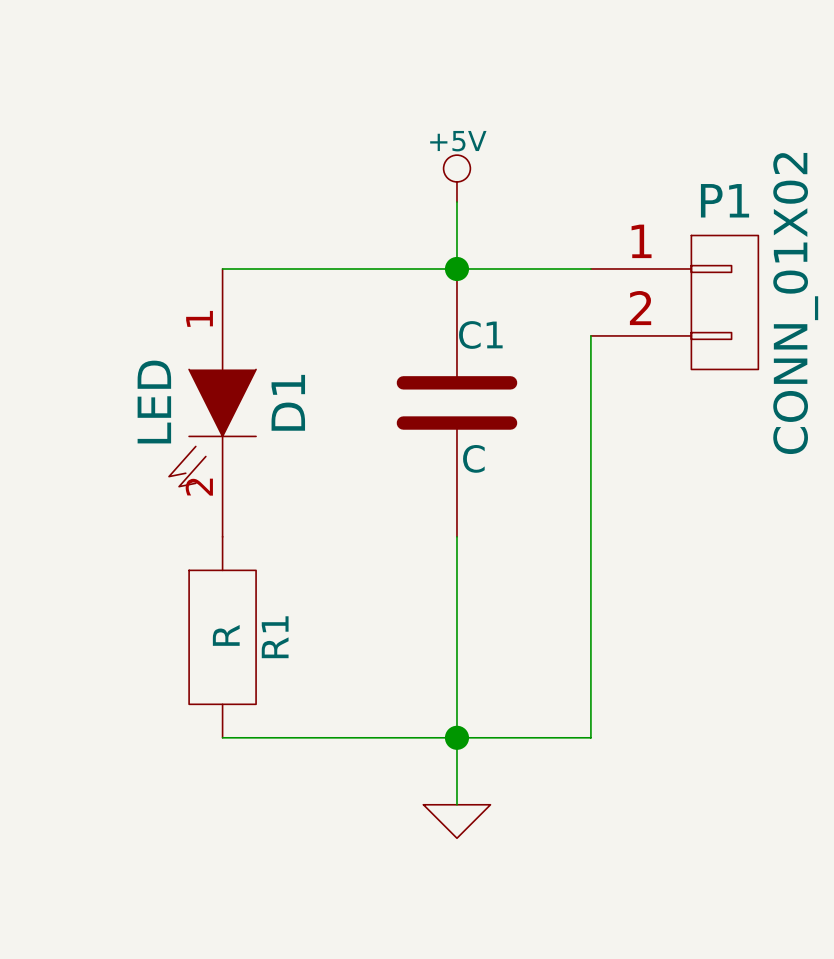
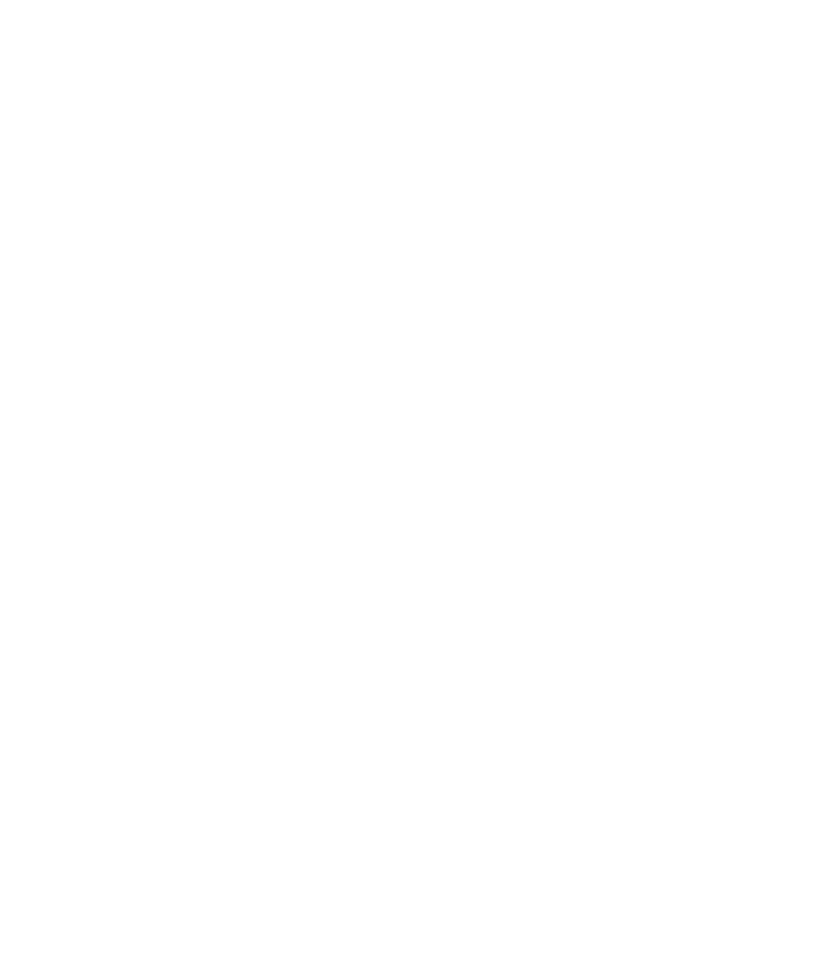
power symbol: +5V (456, 178) -> none
wire: (456, 202) (456, 268) -> none
wire: (222, 268) (590, 268) -> none
junction: (456, 268) -> none
P1: CONN_01X02 (674, 302) -> none
wire: (590, 335) (590, 737) (222, 737) -> none
D1: LED (212, 402) -> none
C1: C (456, 402) -> none
wire: (456, 536) (456, 804) -> none
R1: R (222, 637) -> none
junction: (456, 737) -> none
power symbol: (456, 821) -> none

